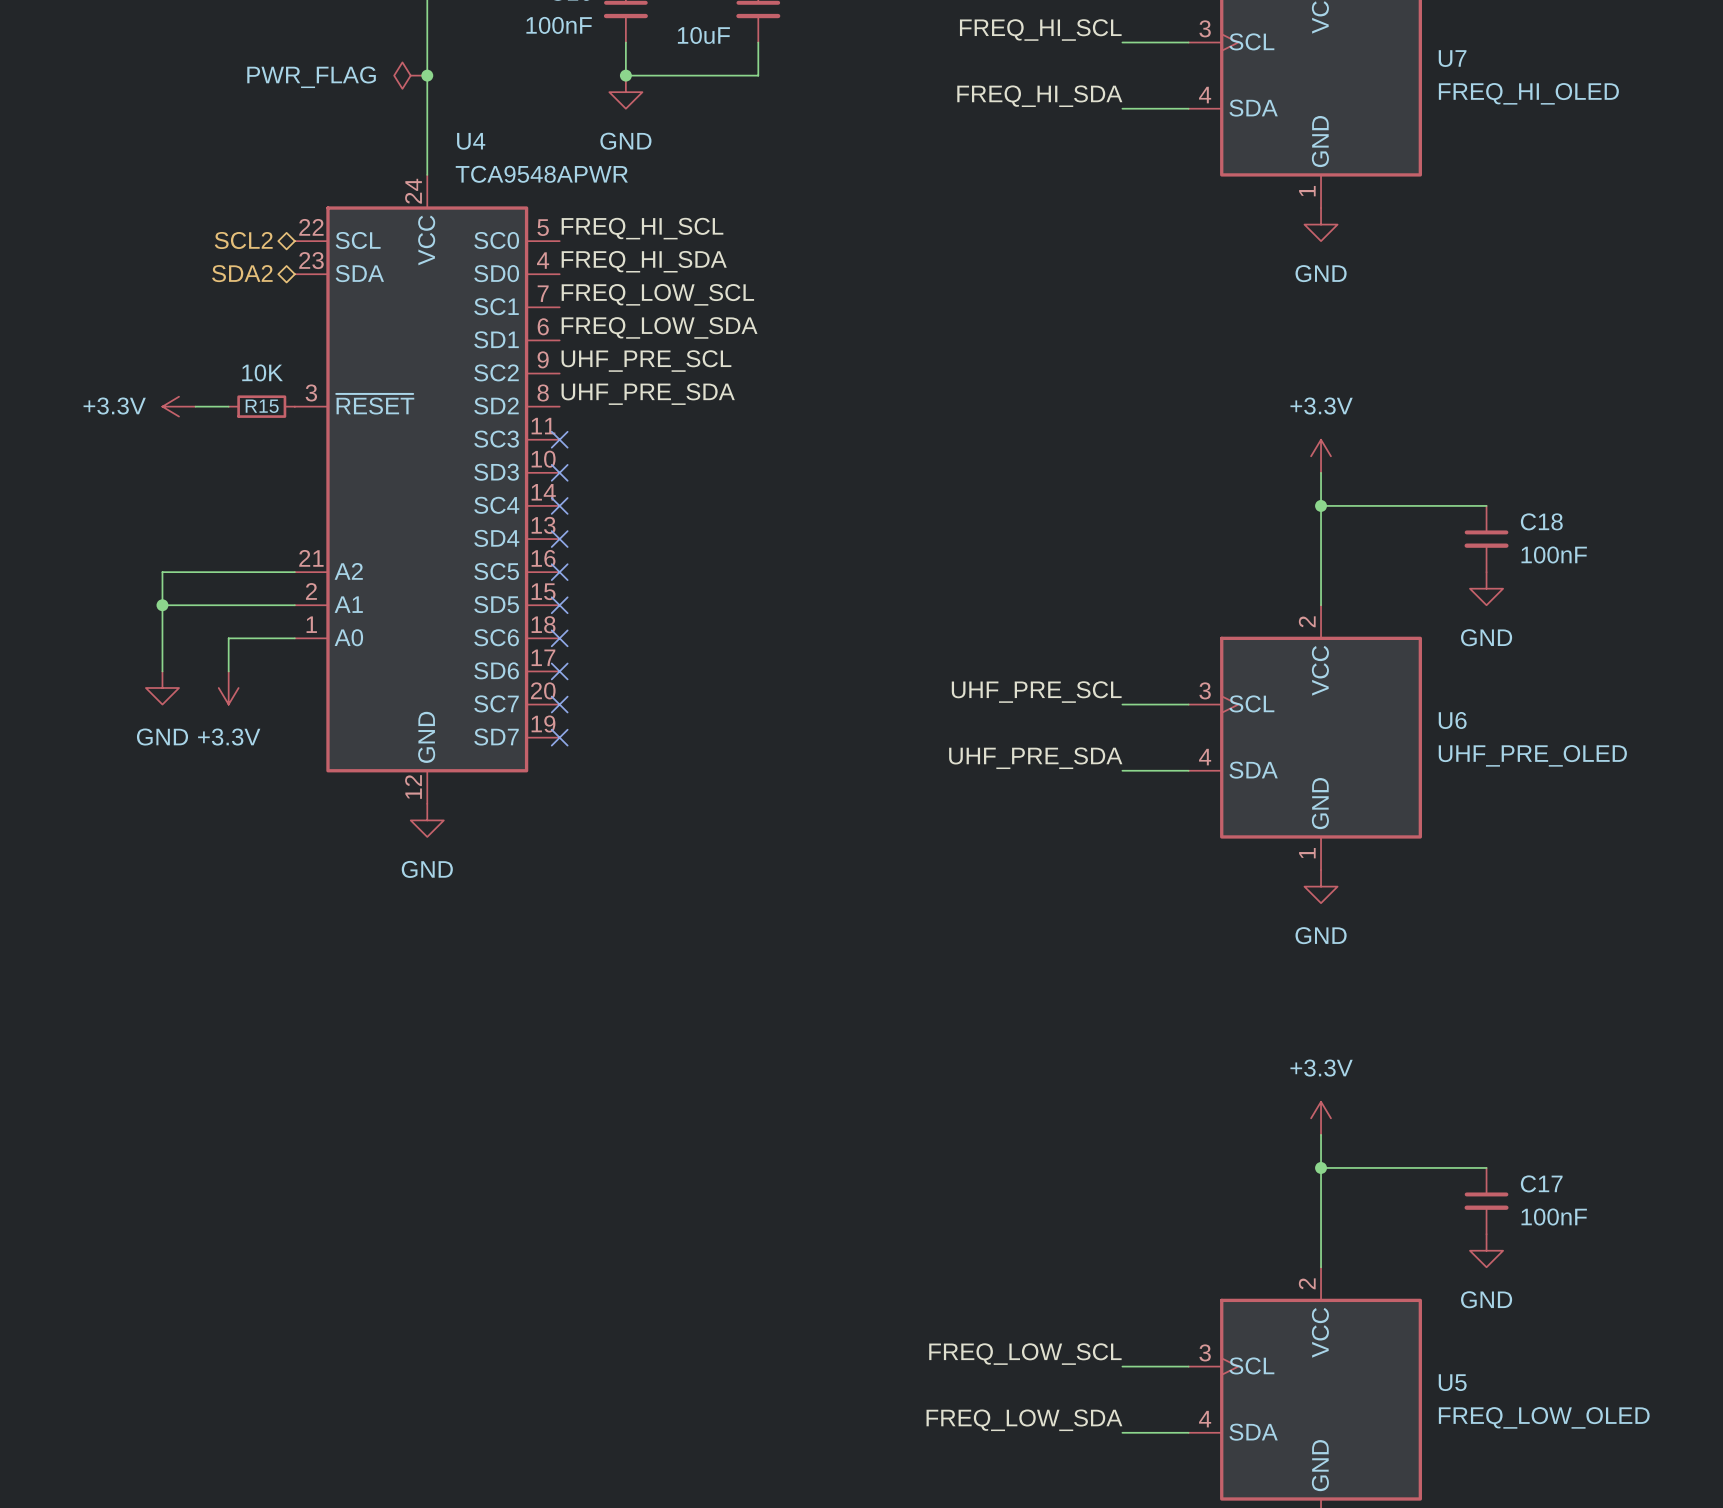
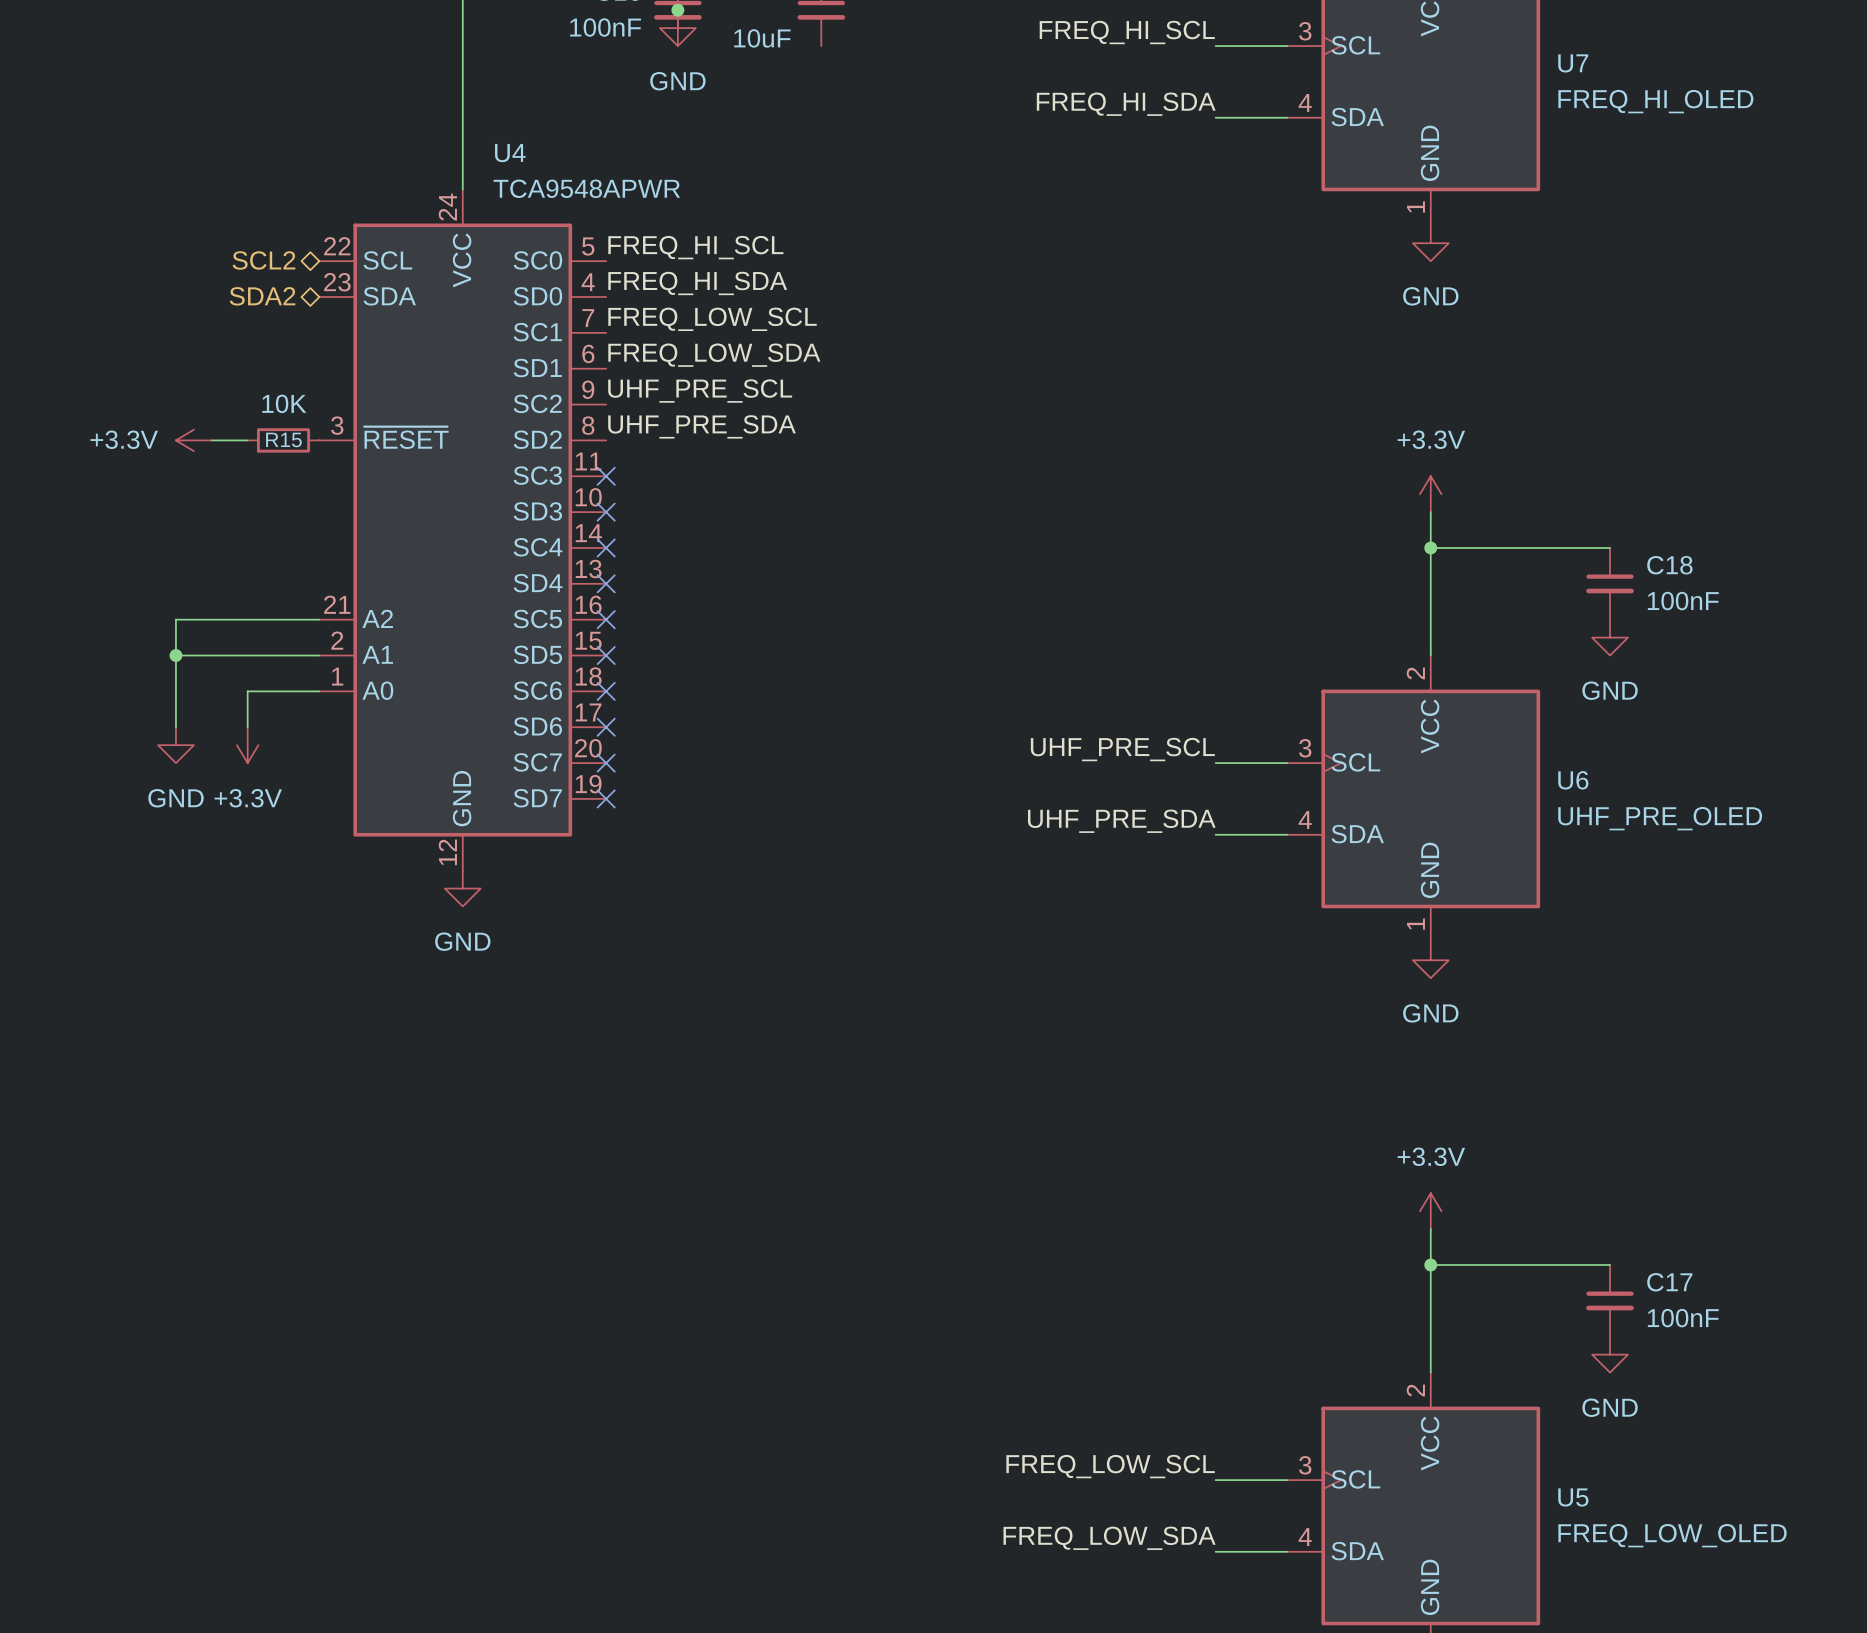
wire: (625, 42) (625, 75) (758, 75) (758, 42) -> none
power symbol: PWR_FLAG (410, 75) -> none
junction: (427, 75) -> none
junction position: (625, 75) -> (677, 10)
power symbol position: GND (625, 92) -> GND (677, 28)

